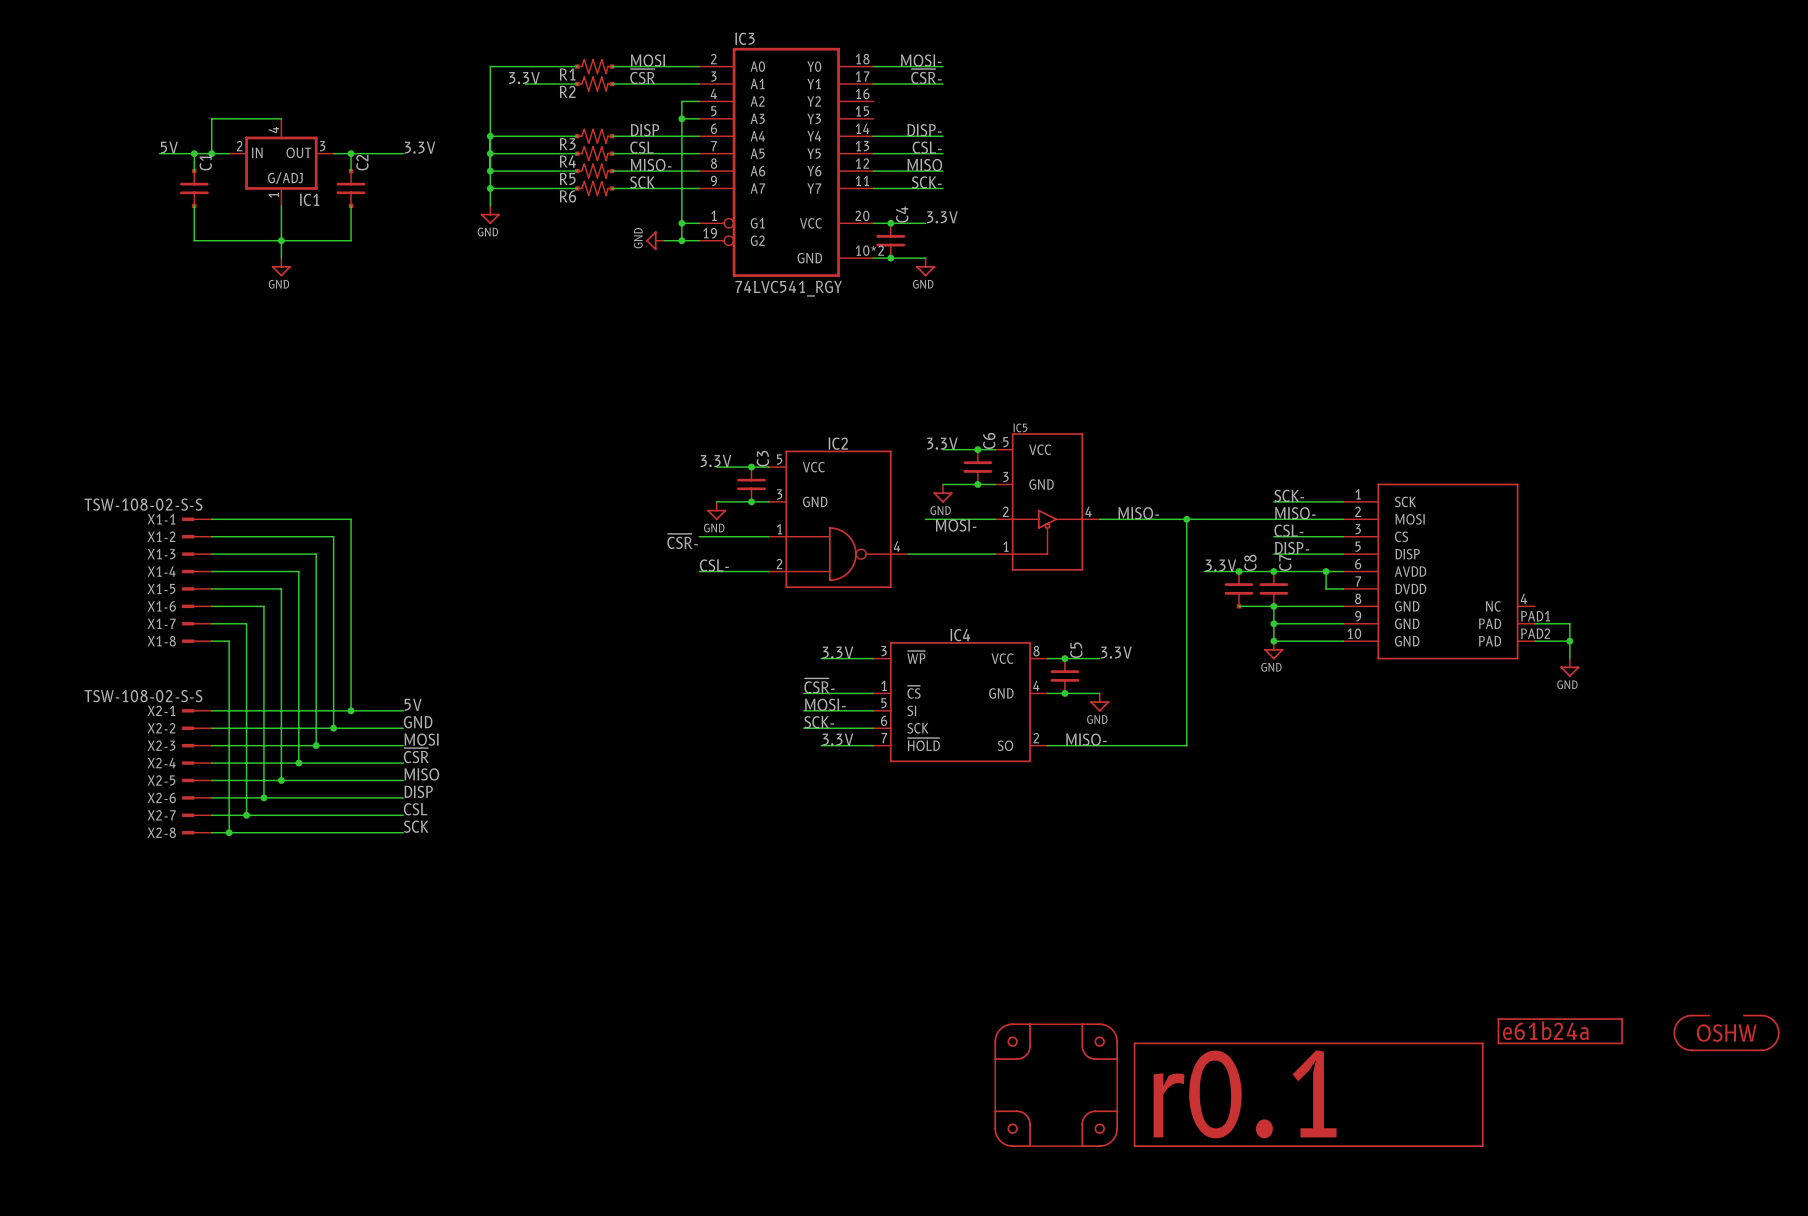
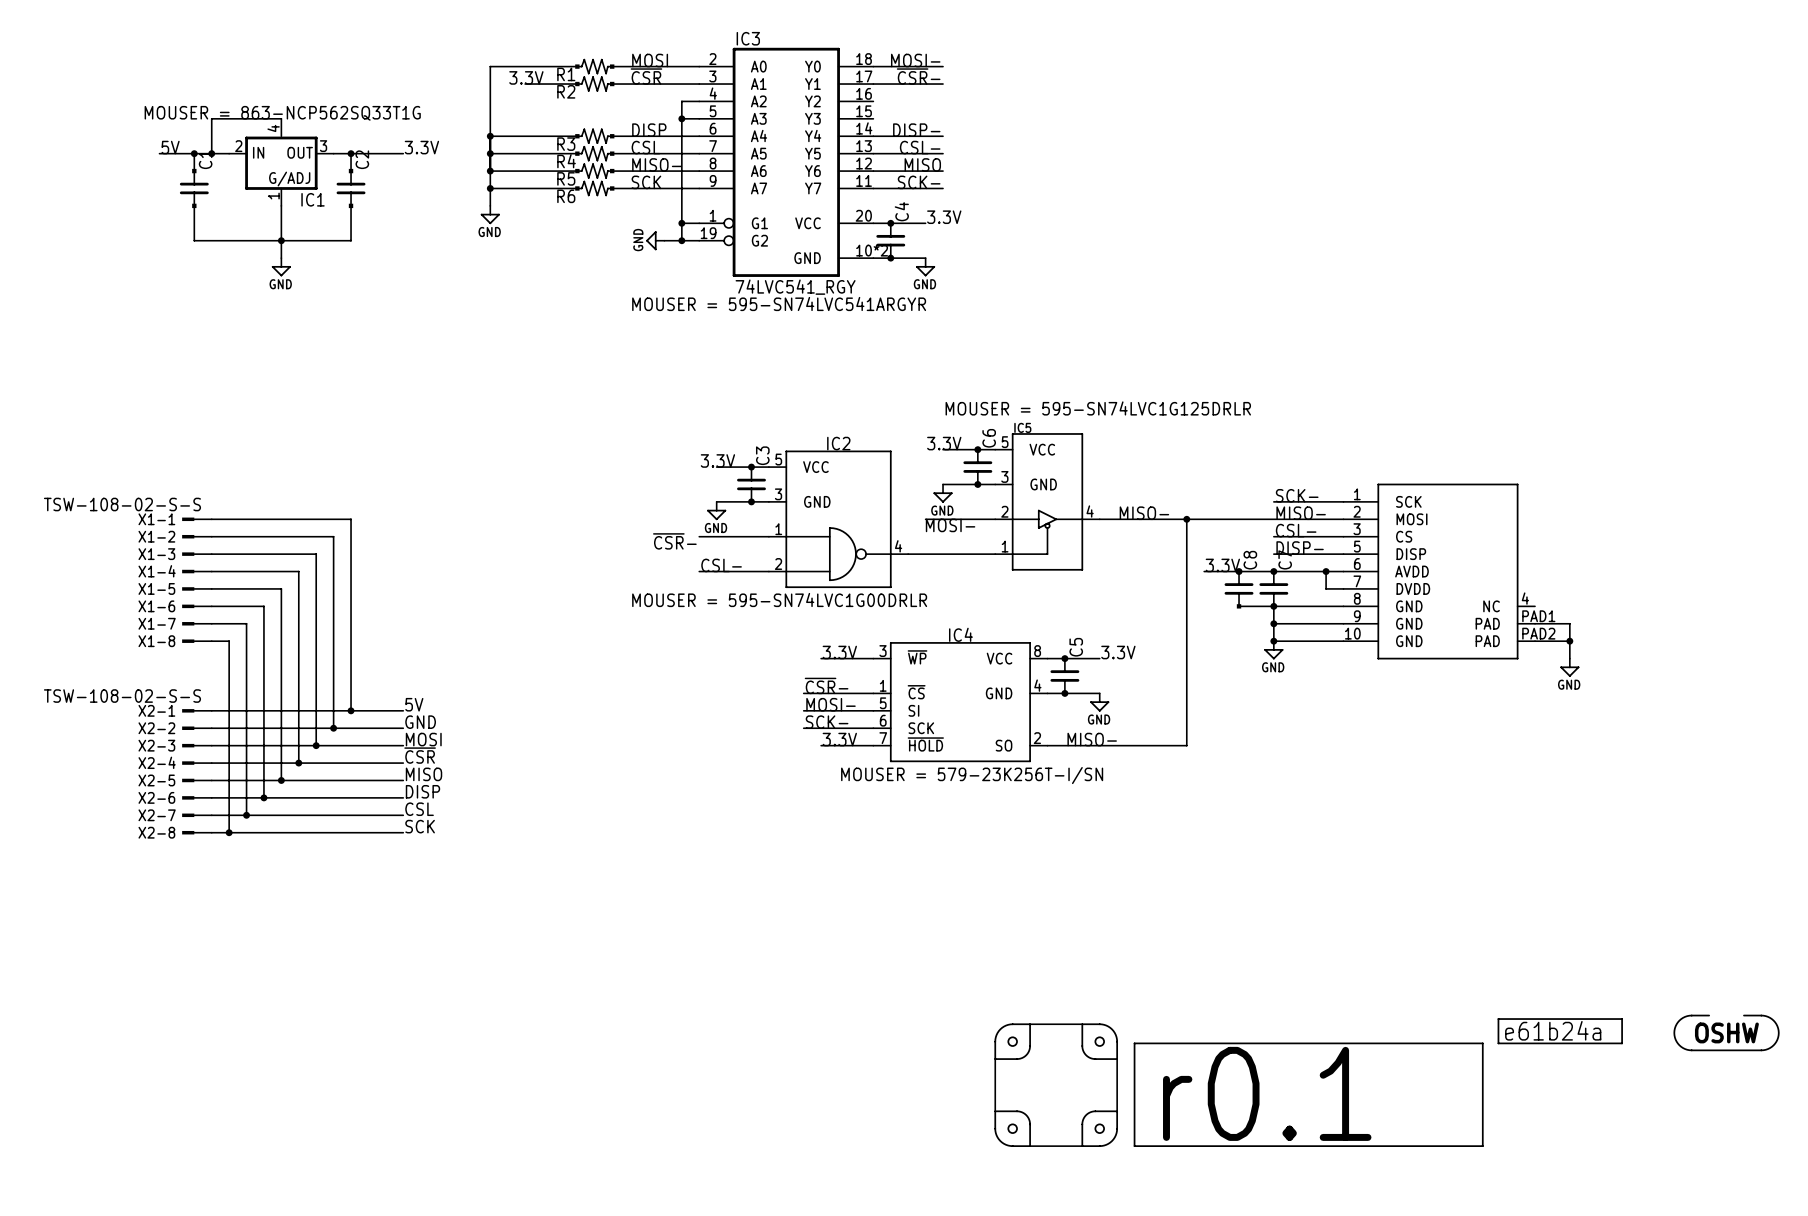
IC1 text: none -> MOUSER = 863-NCP562SQ33T1G (282, 113)
IC3 text: none -> MOUSER = 595-SN74LVC541ARGYR (779, 303)
IC5 text: none -> MOUSER = 595-SN74LVC1G125DRLR (1098, 408)
IC2 text: none -> MOUSER = 595-SN74LVC1G00DRLR (779, 599)
IC4 text: none -> MOUSER = 579-23K256T-I/SN (972, 775)

